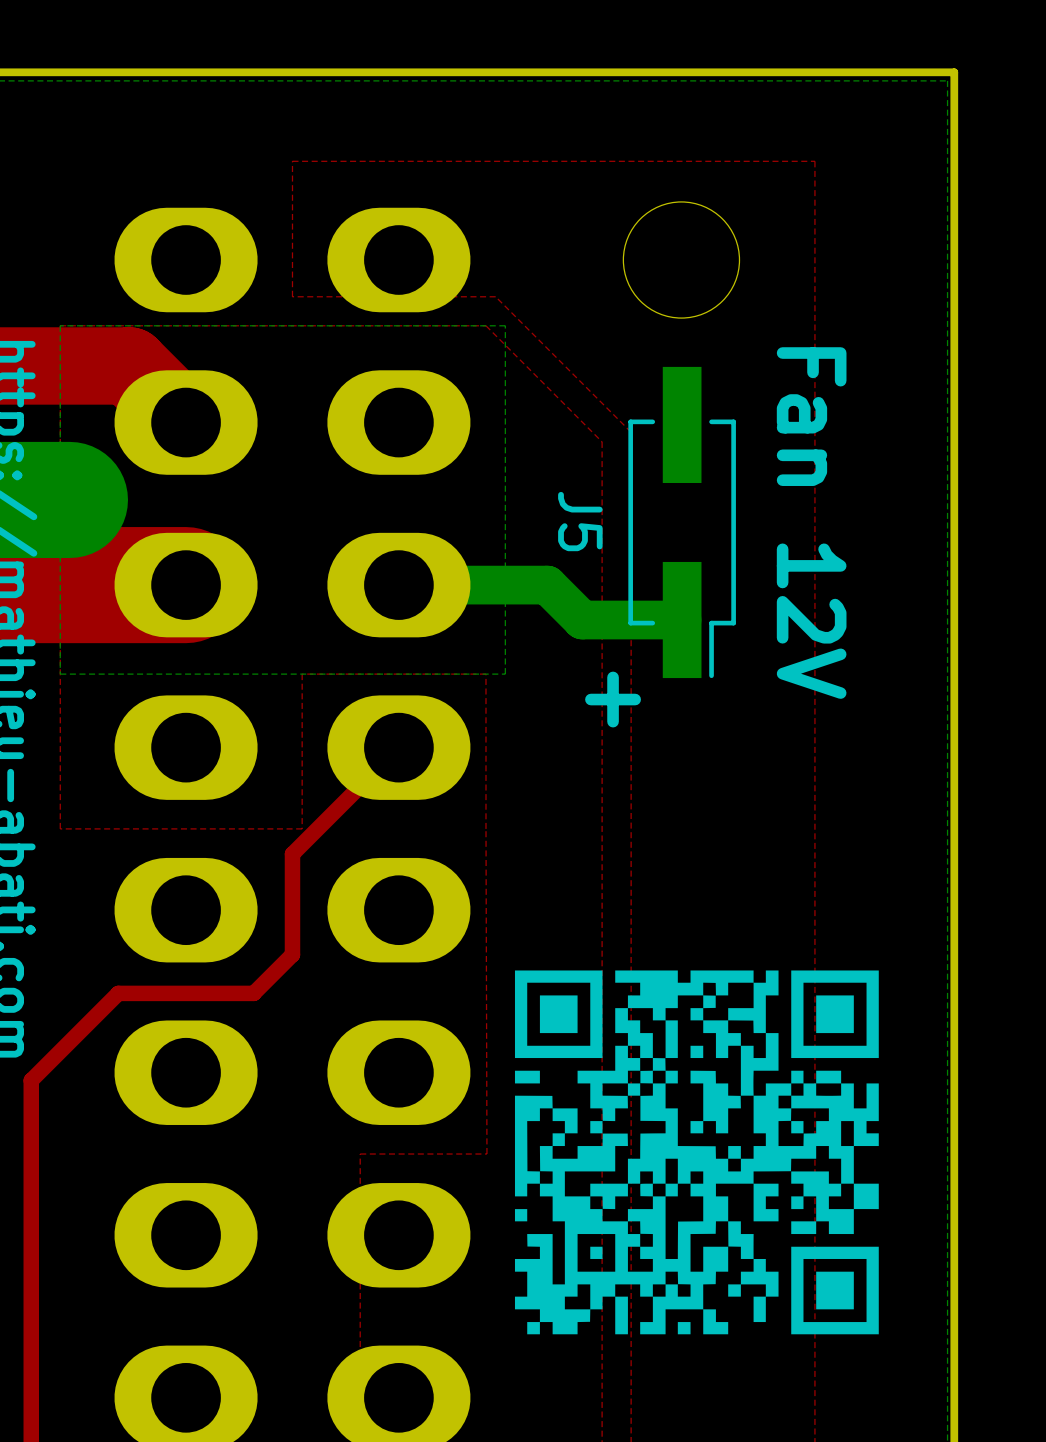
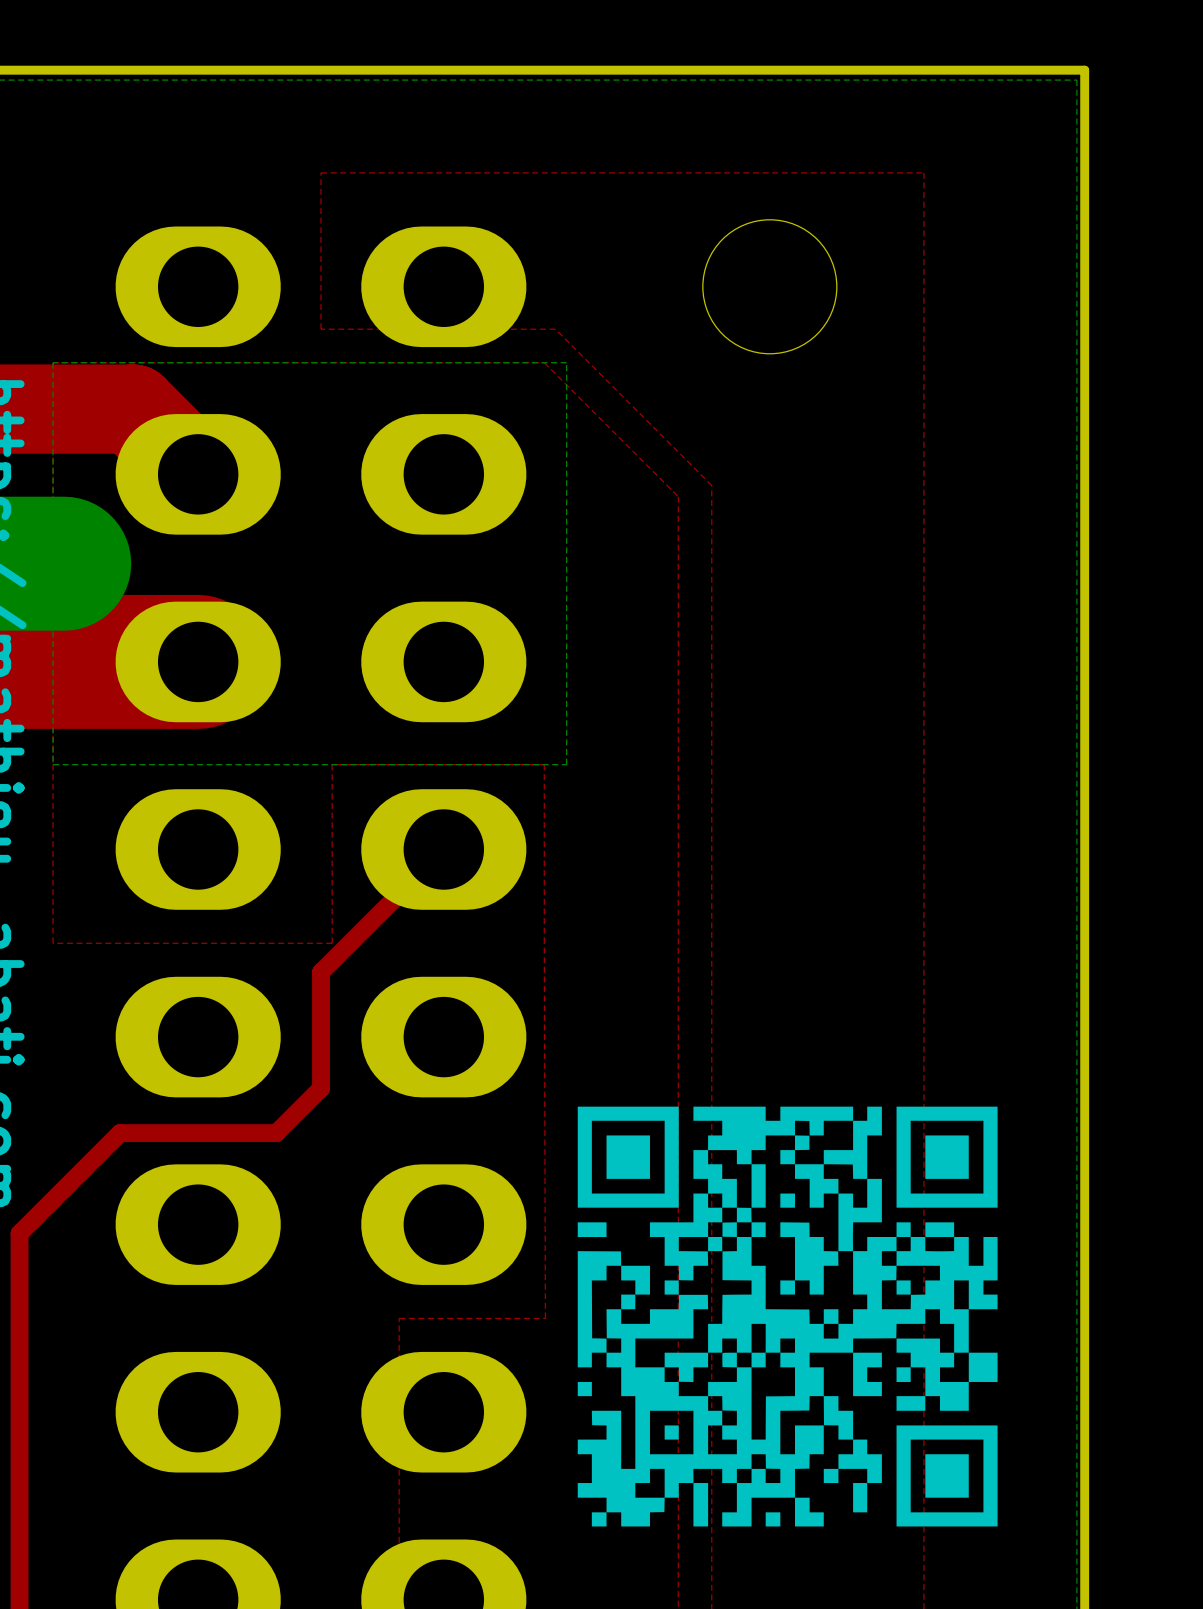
J5: (682, 522) -> none
text: Fan 12V (811, 523) -> none
bottom track: (398, 585) (547, 585) (582, 620) (682, 620) -> none
text: + (613, 699) -> none

